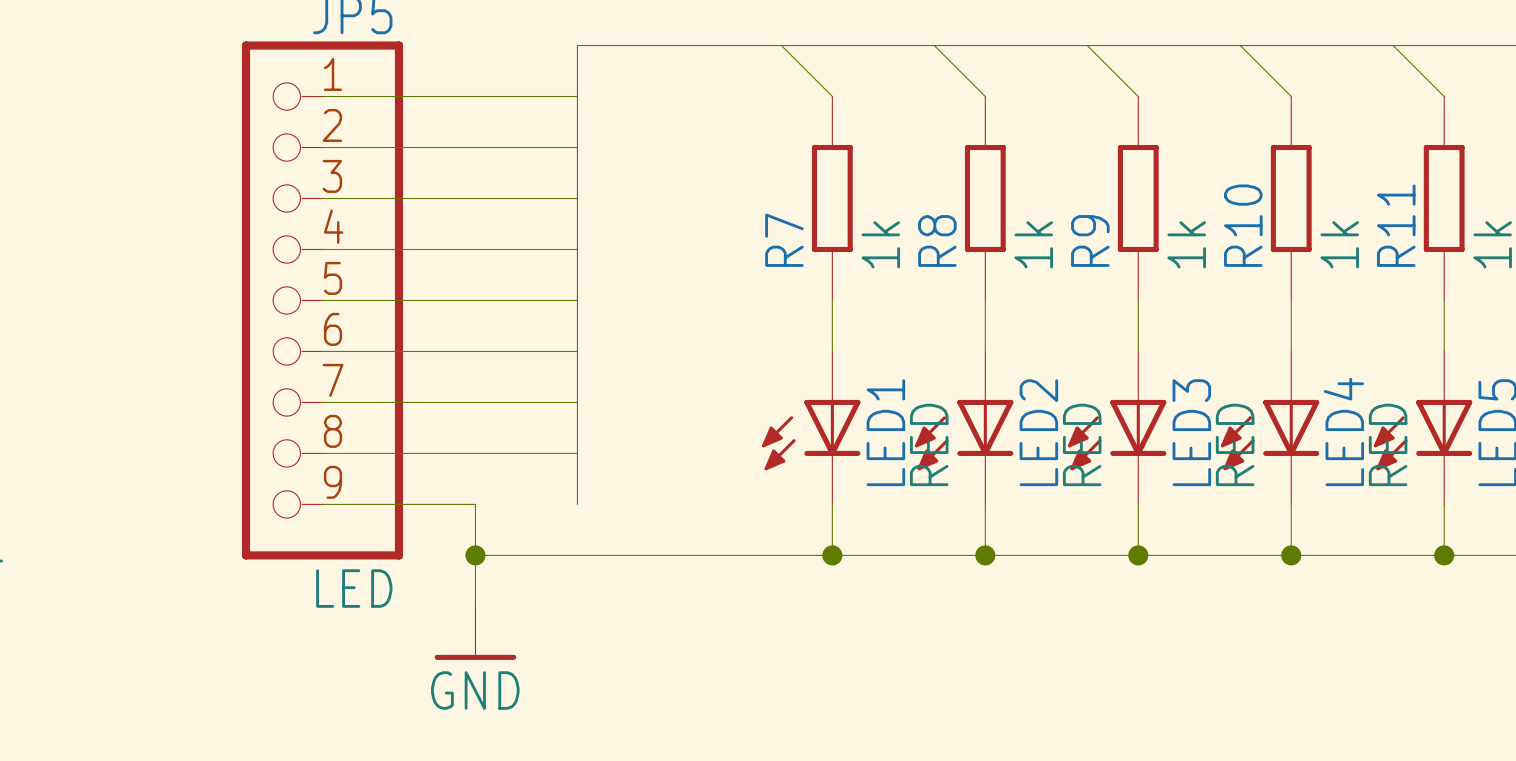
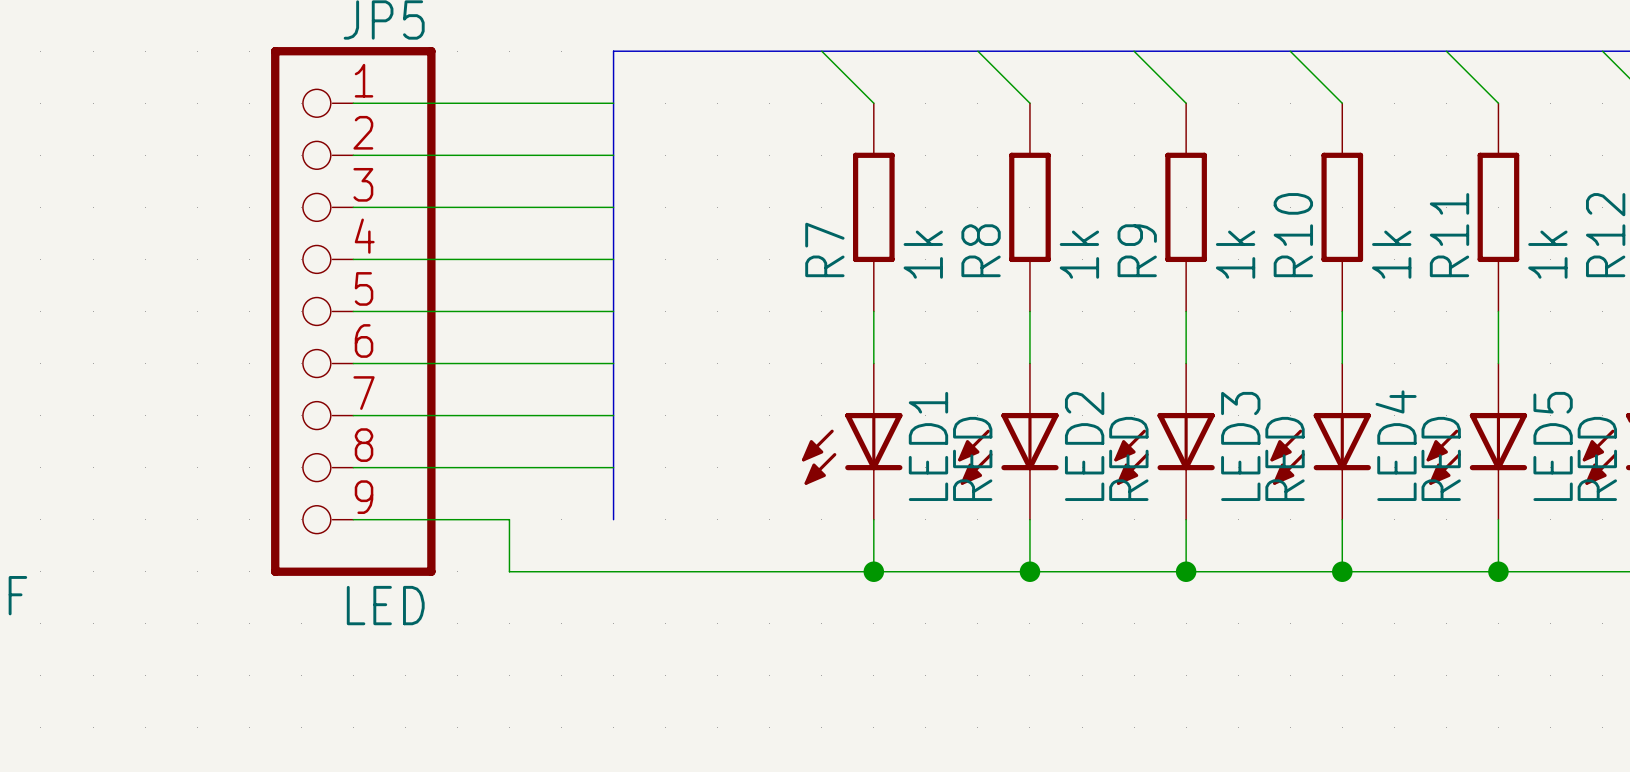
wire: (475, 555) (475, 606) -> none
junction: (475, 555) -> none
power symbol: GND (475, 633) -> none

